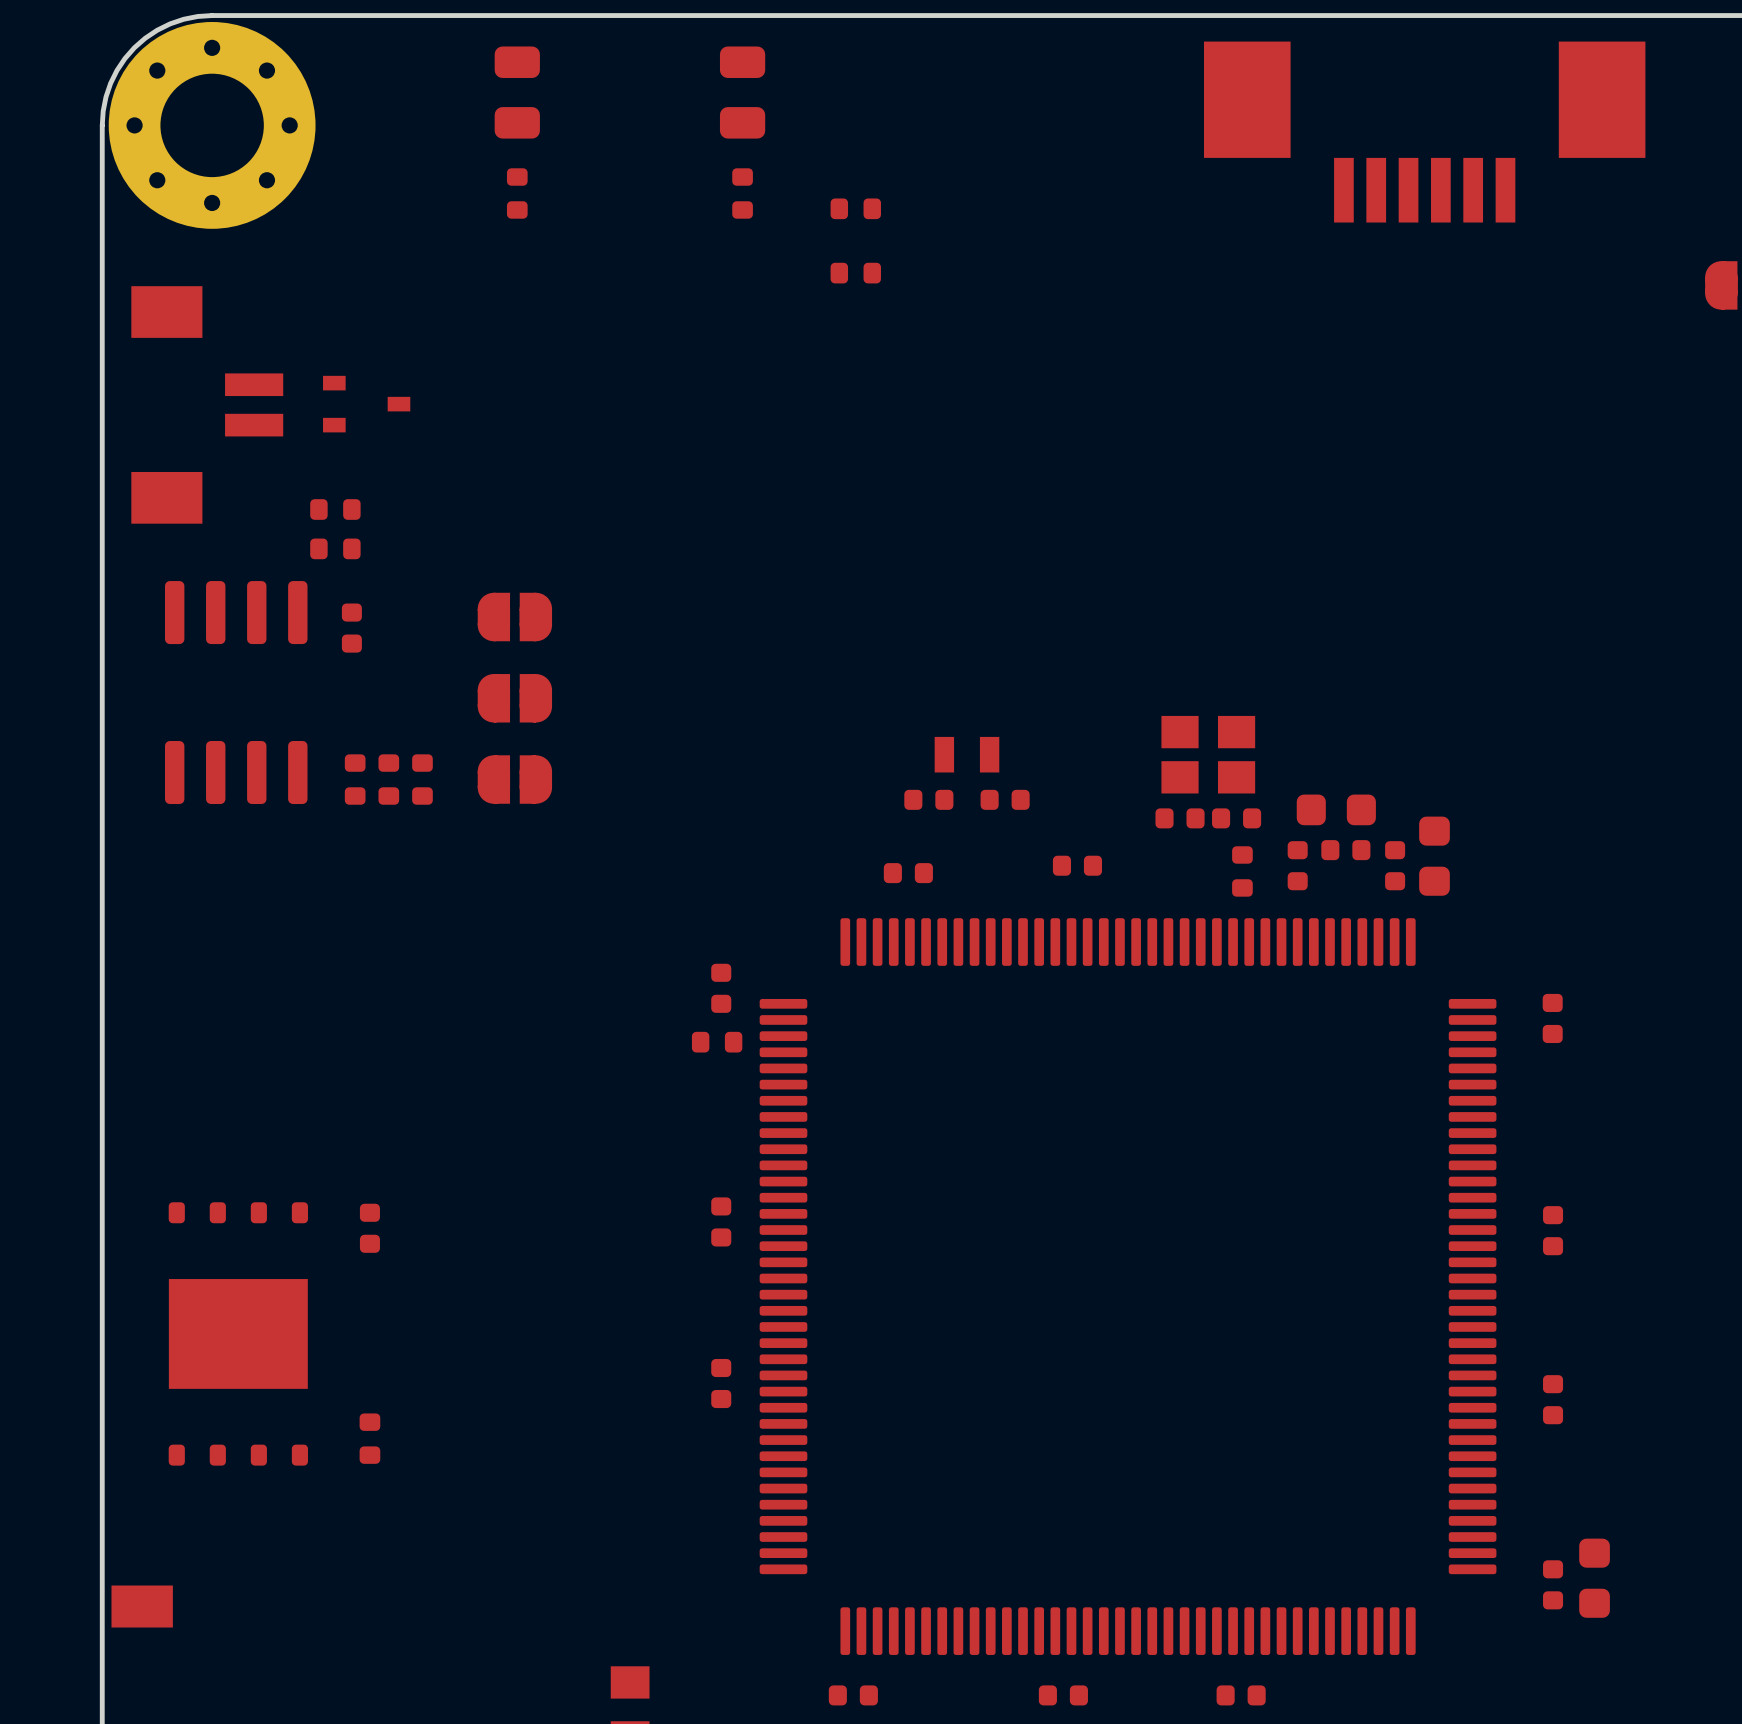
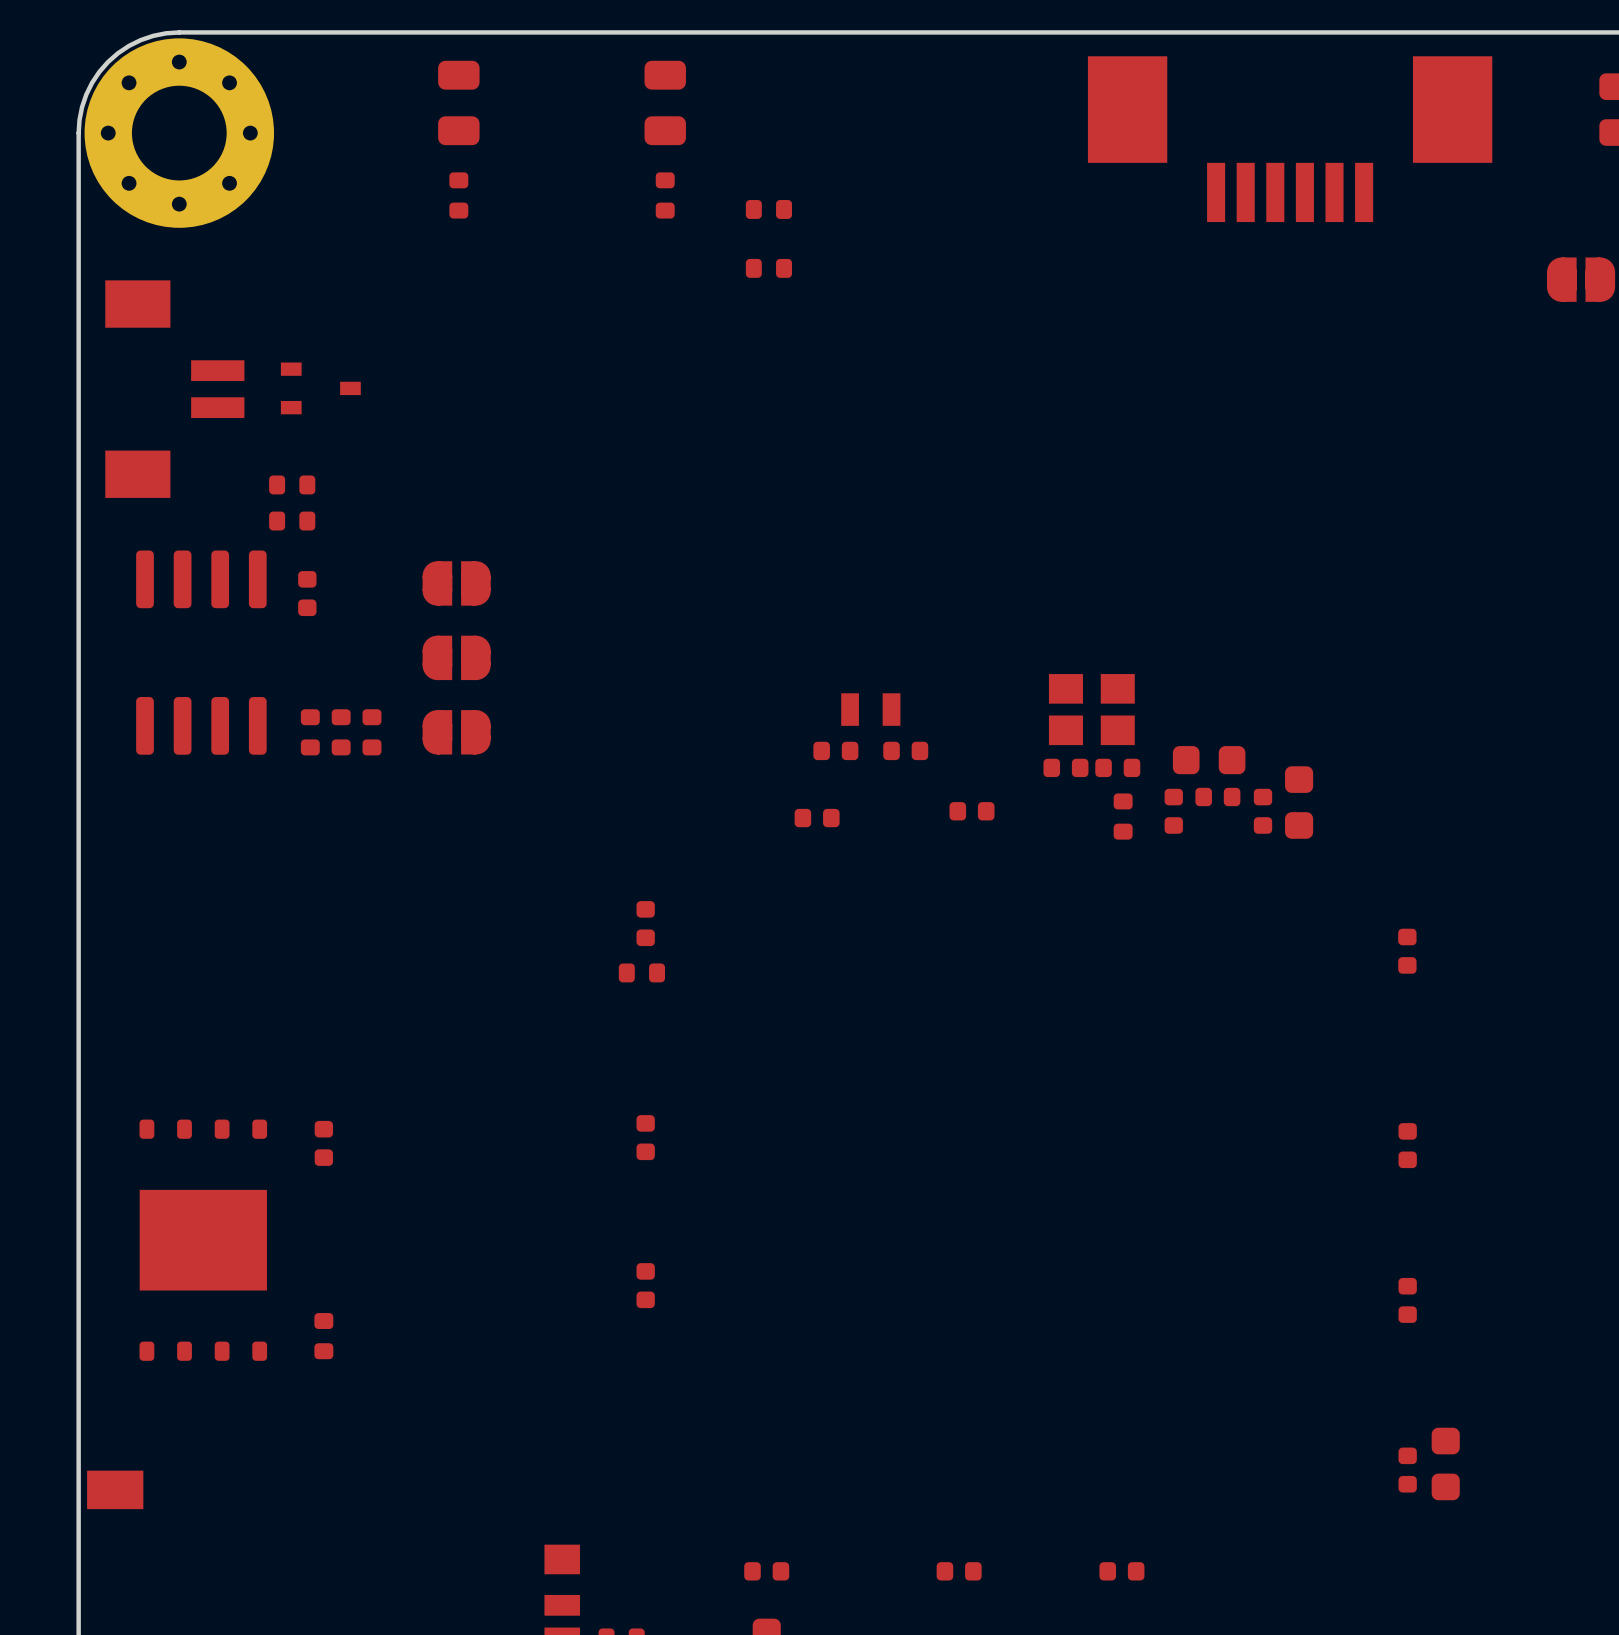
part: (1128, 1286) -> none

